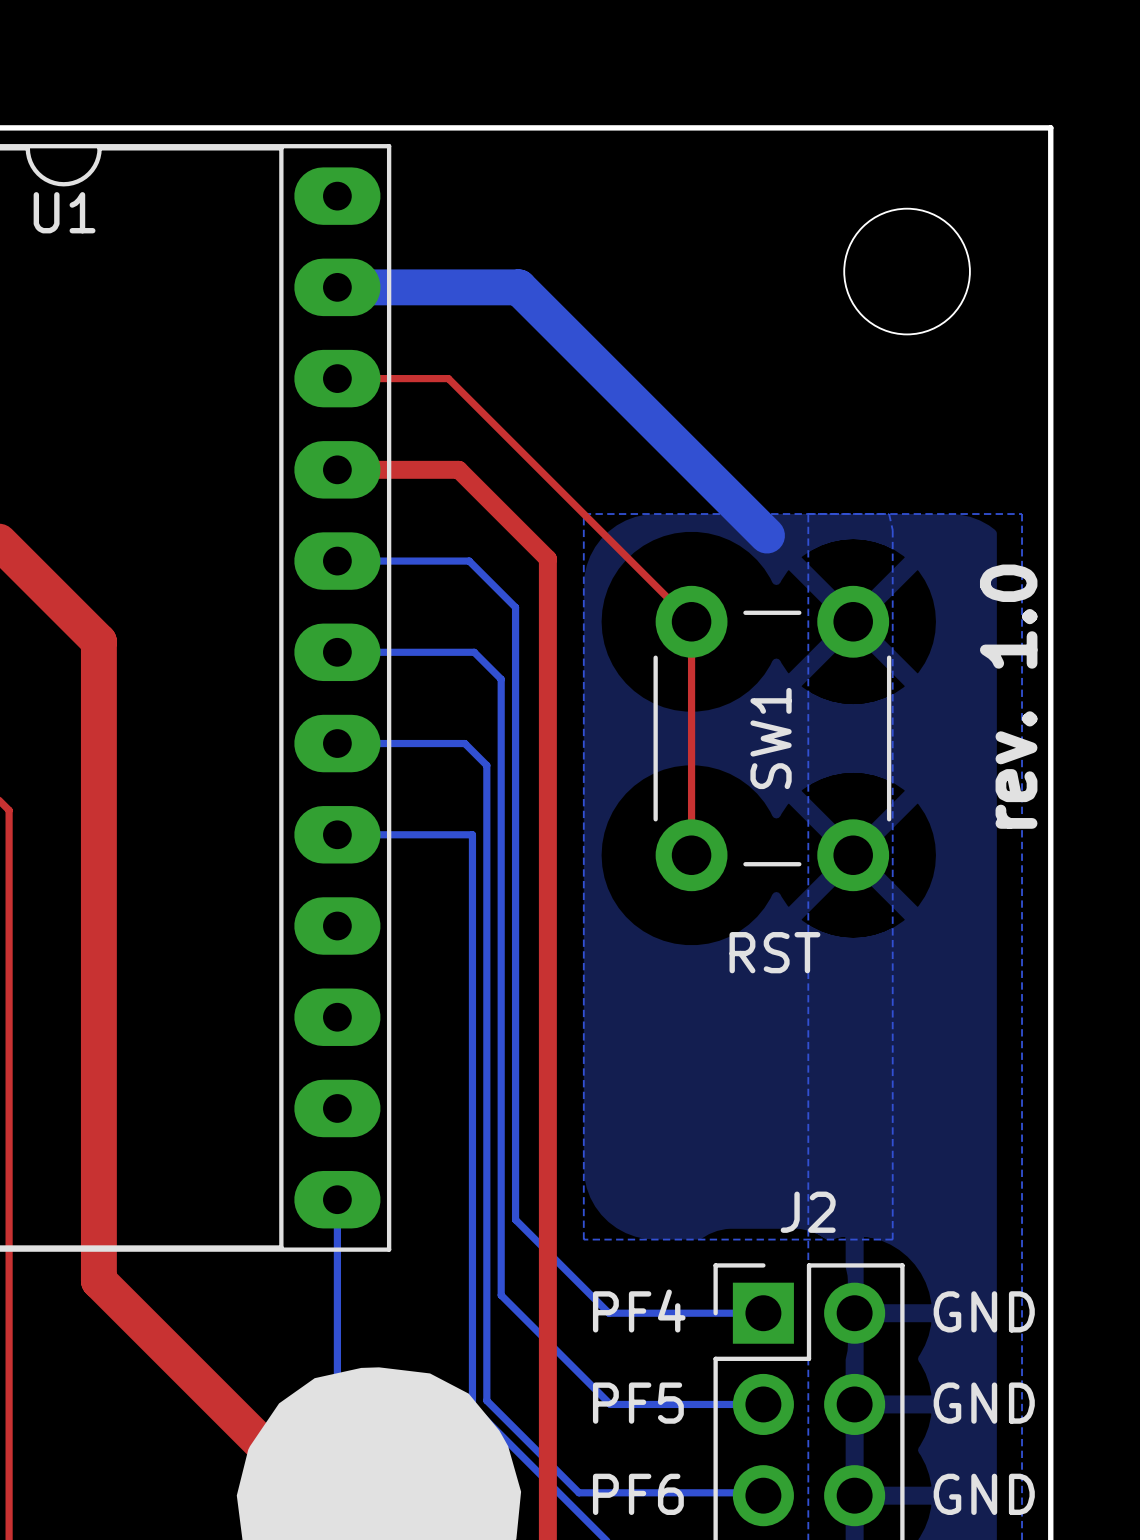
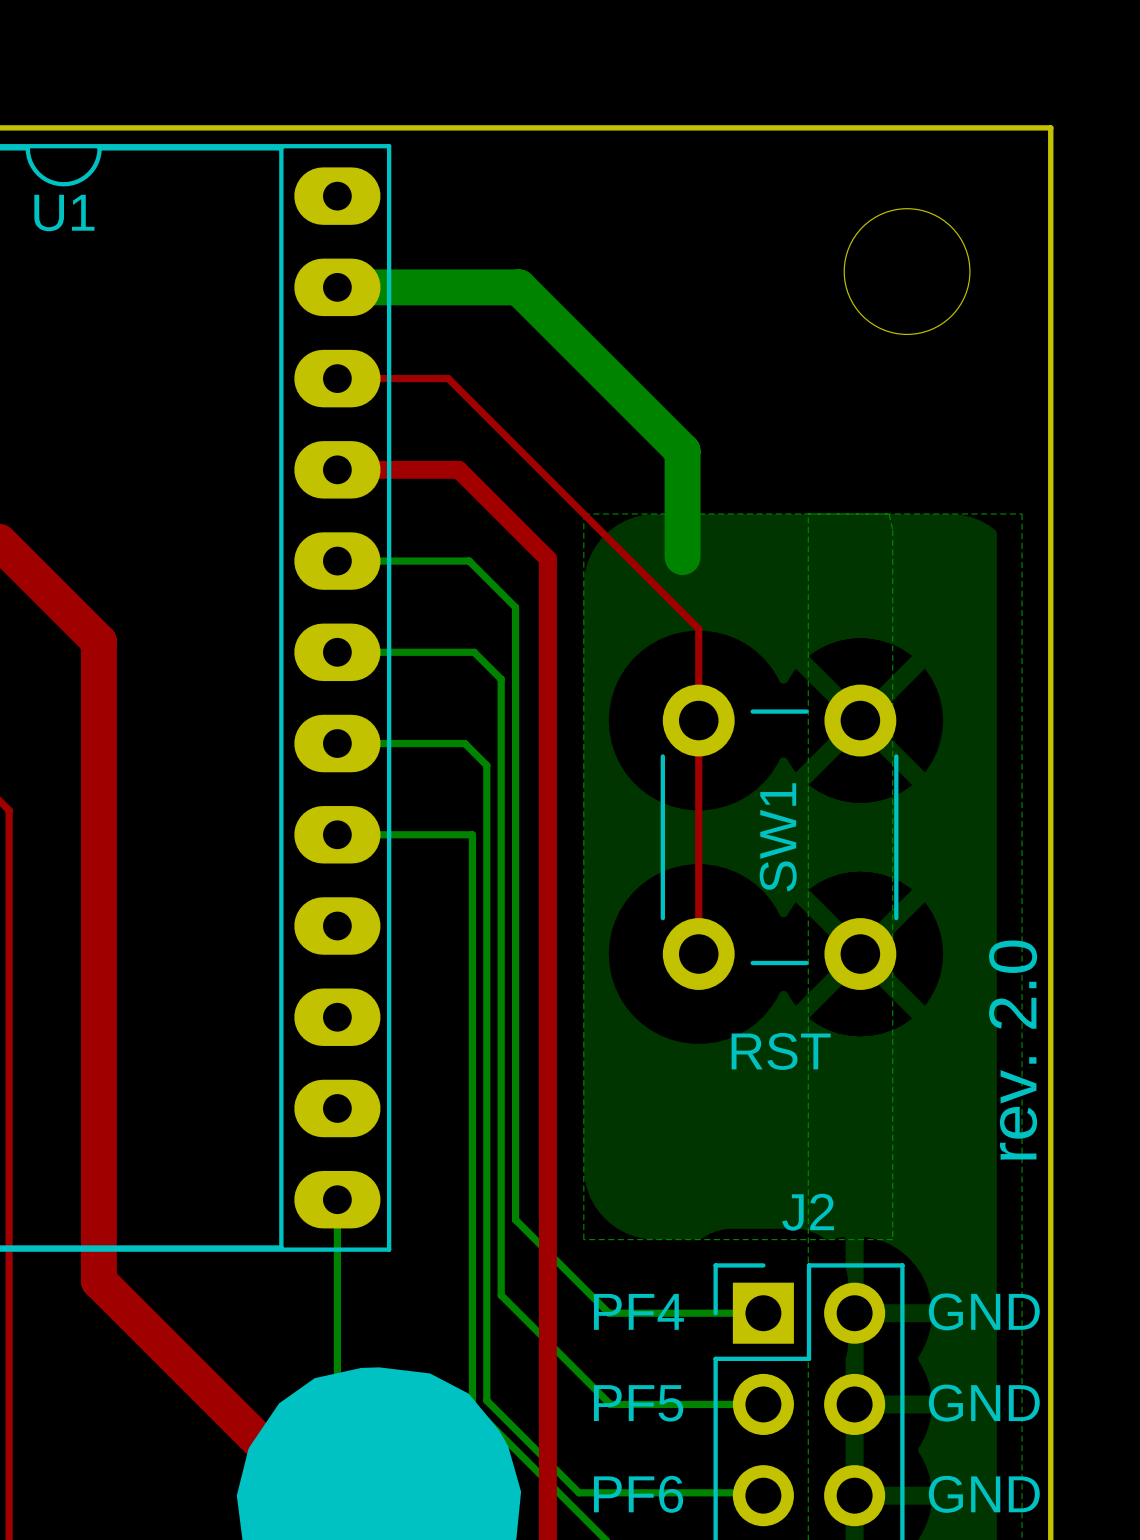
bottom track: (682, 451) (766, 535) -> (682, 451) (682, 557)
top track: (691, 621) (691, 855) -> (691, 621) (698, 628) (698, 954)
text: rev. 1.0 (1008, 696) -> rev. 2.0 (1013, 1050)
SW1 position: (772, 738) -> (779, 837)

